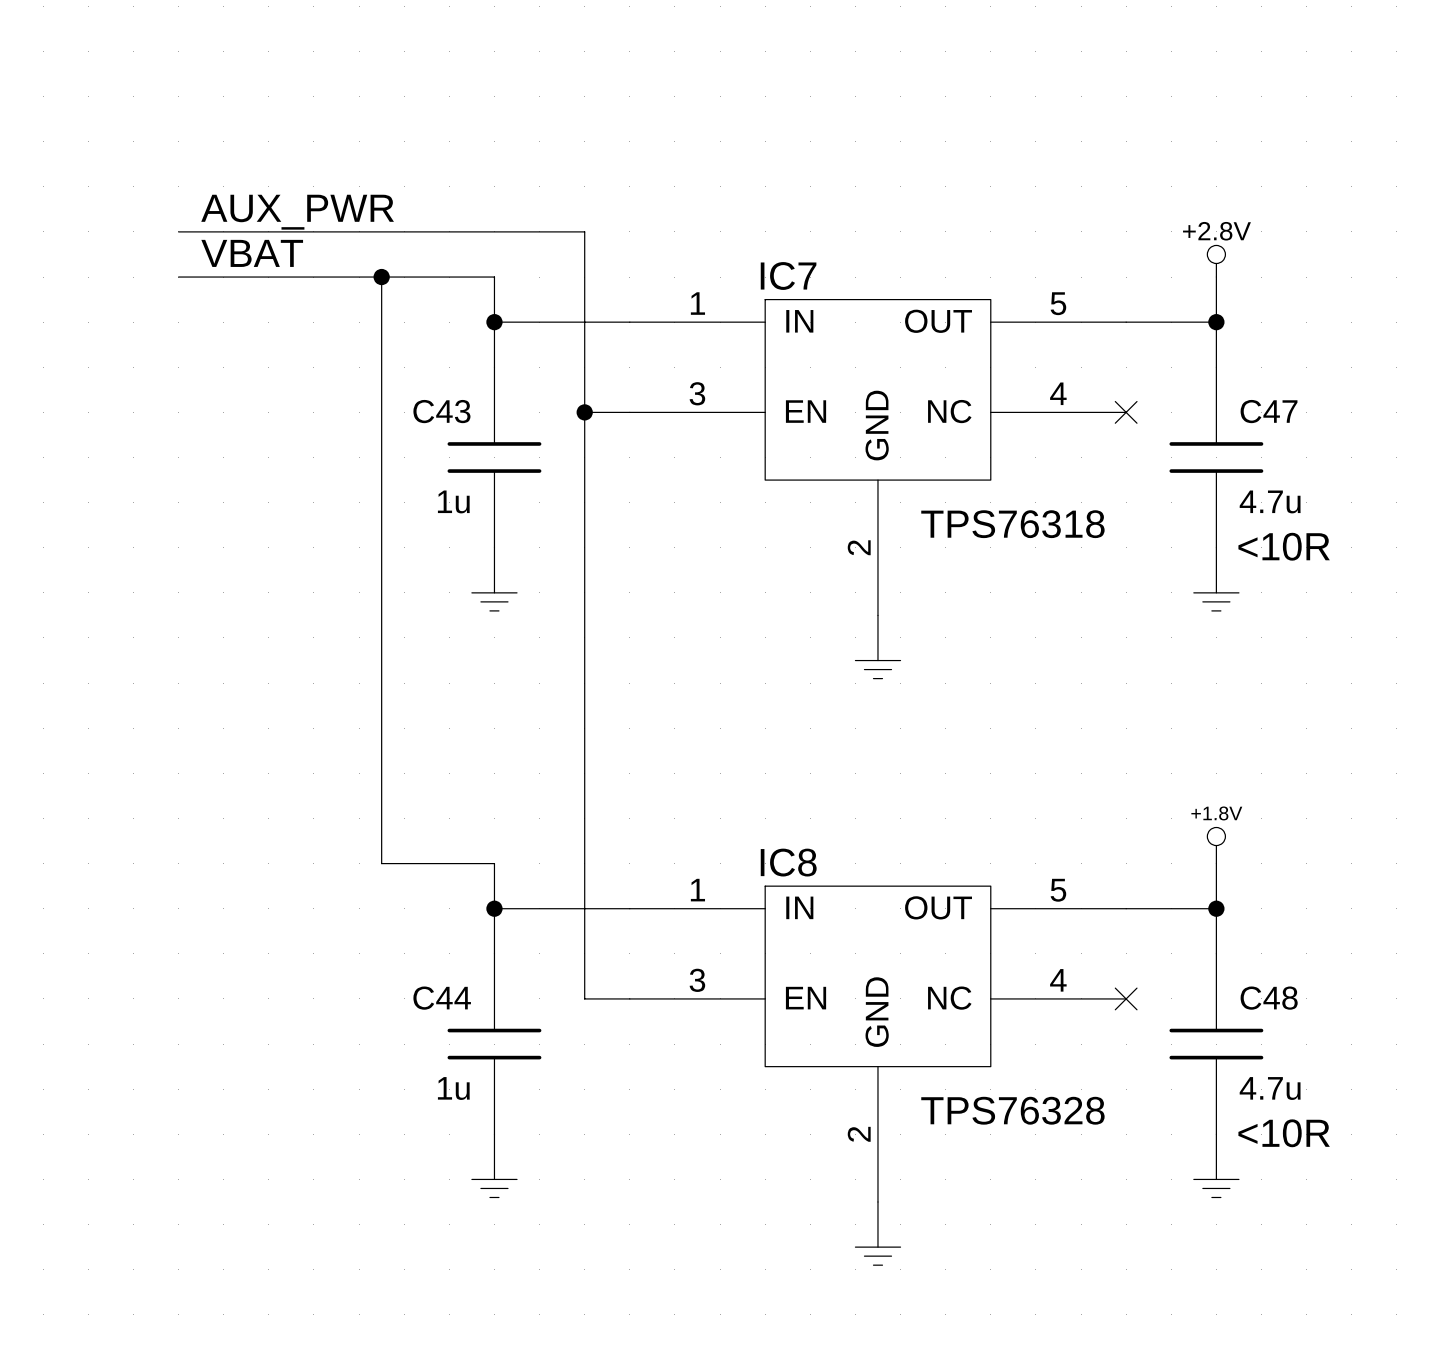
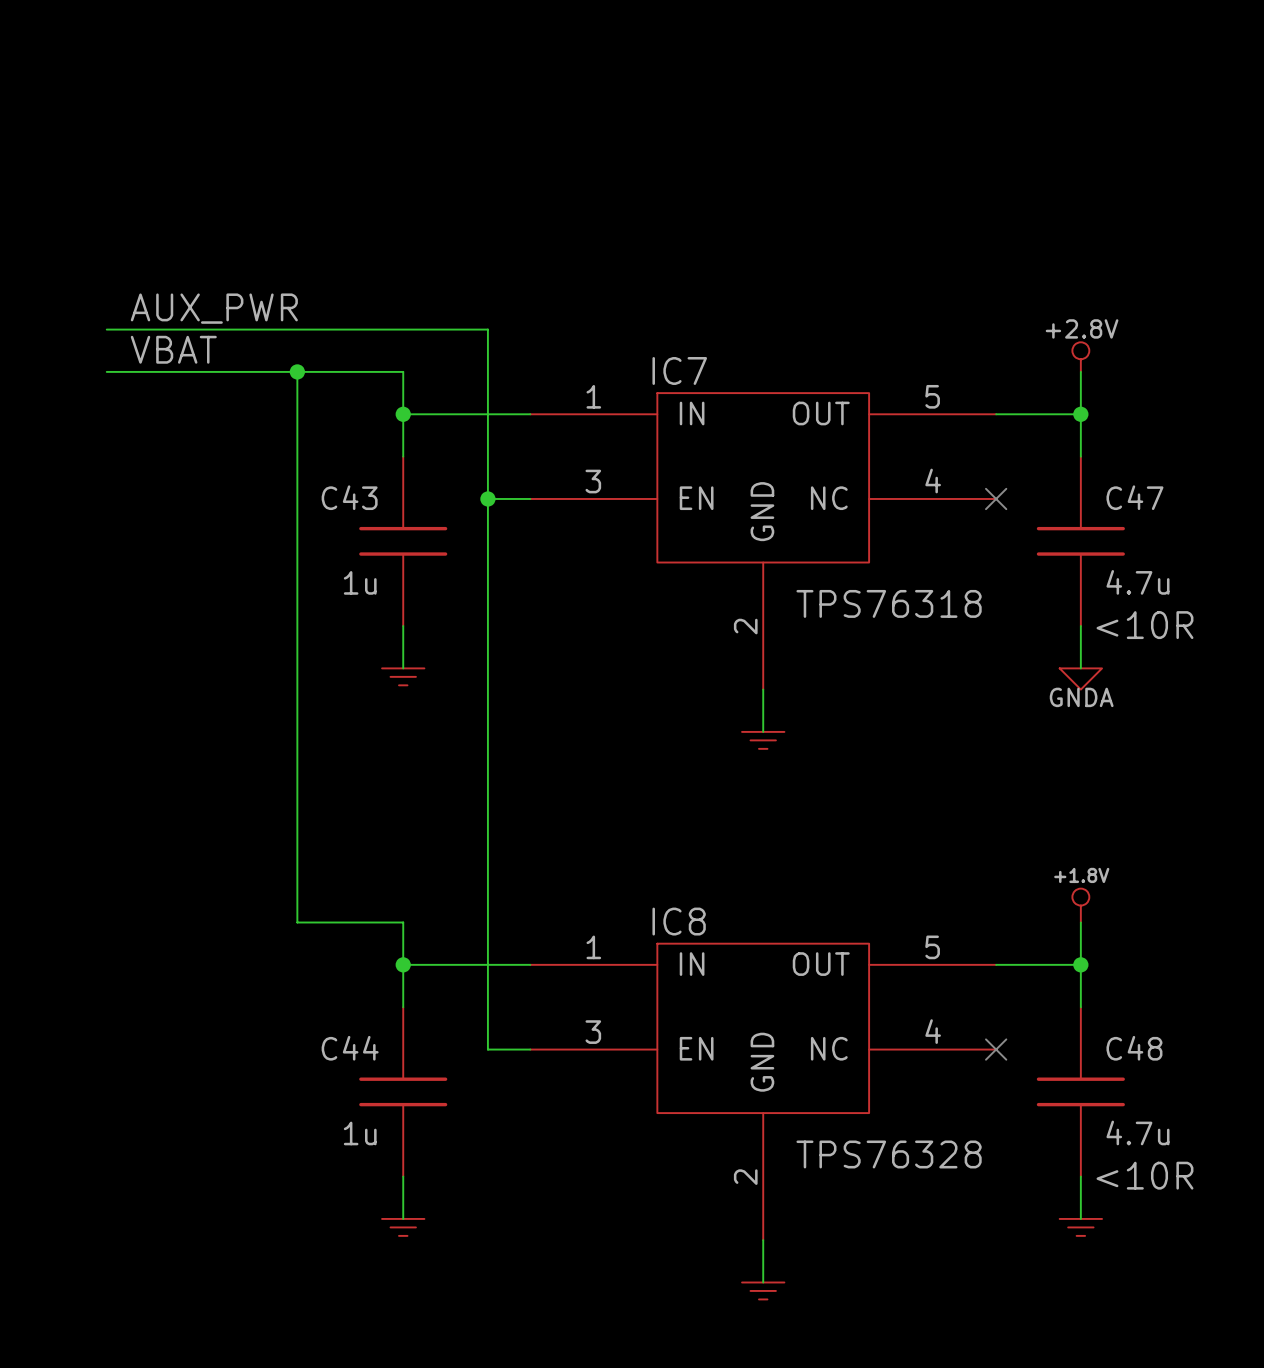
power symbol shape: [1193, 592, 1239, 611] -> [1059, 668, 1103, 690]
power symbol text: none -> GNDA (1081, 697)

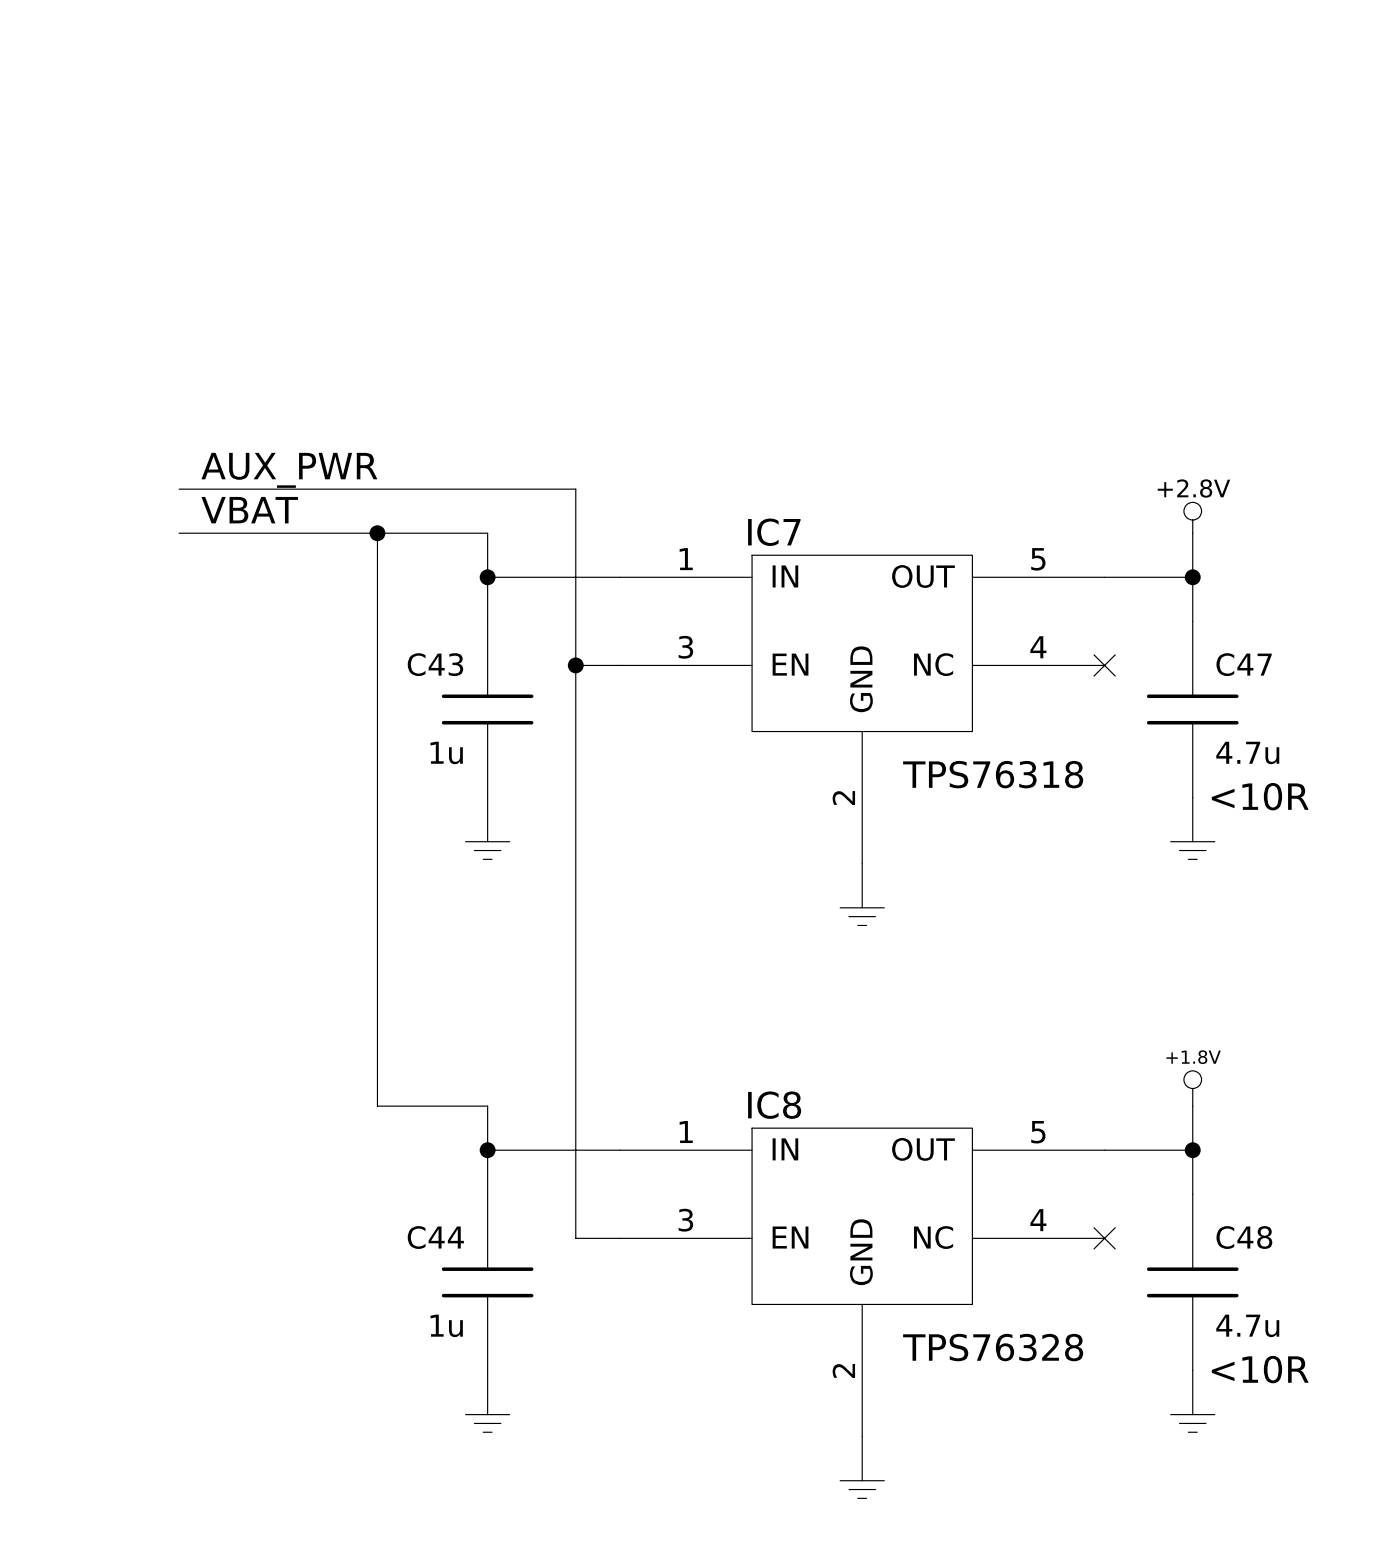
power symbol shape: [1059, 668, 1103, 690] -> [1170, 841, 1215, 860]
power symbol text: GNDA (1081, 697) -> none

